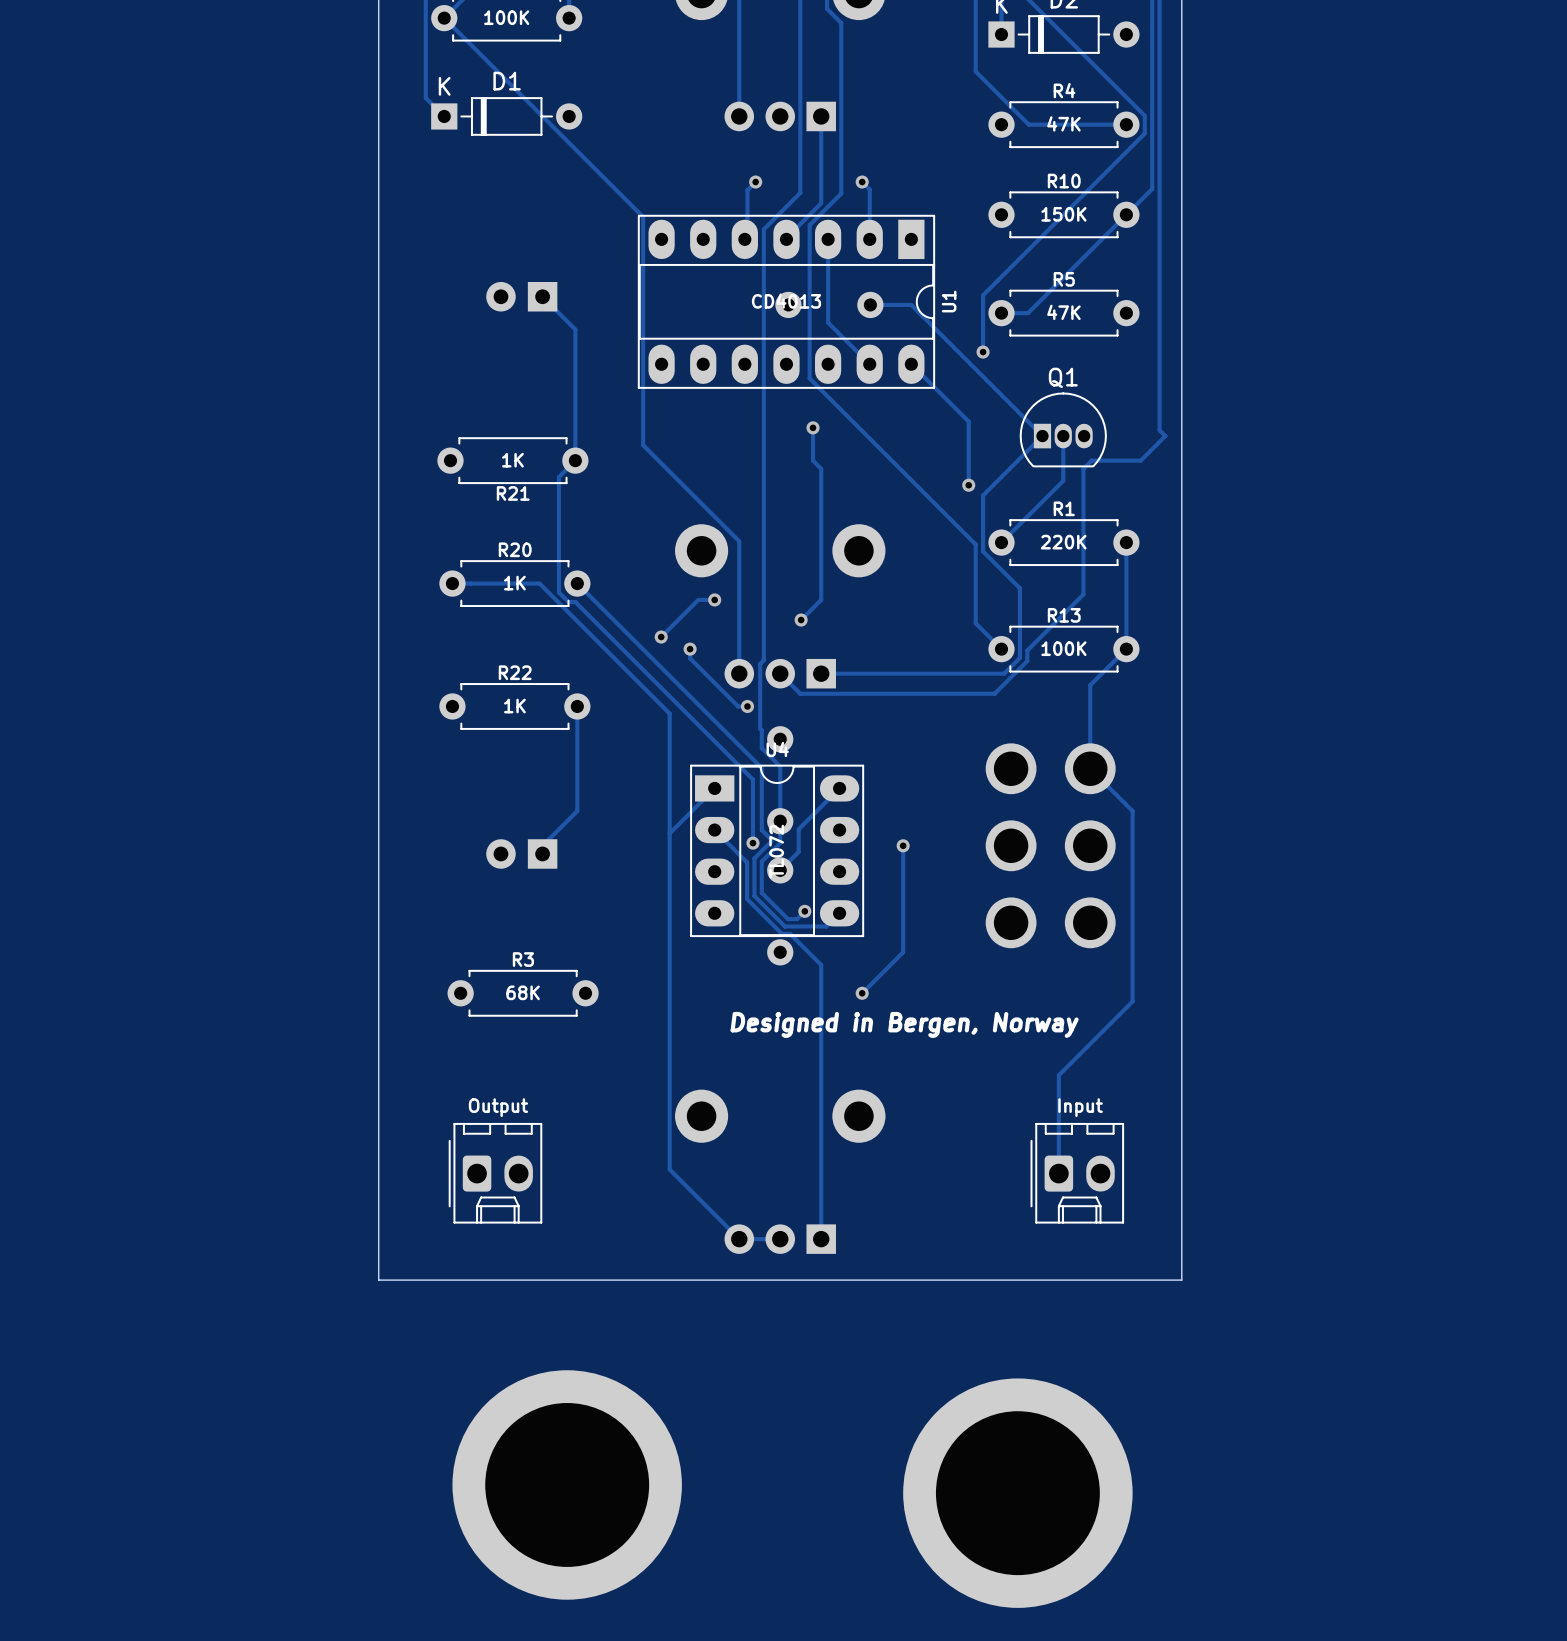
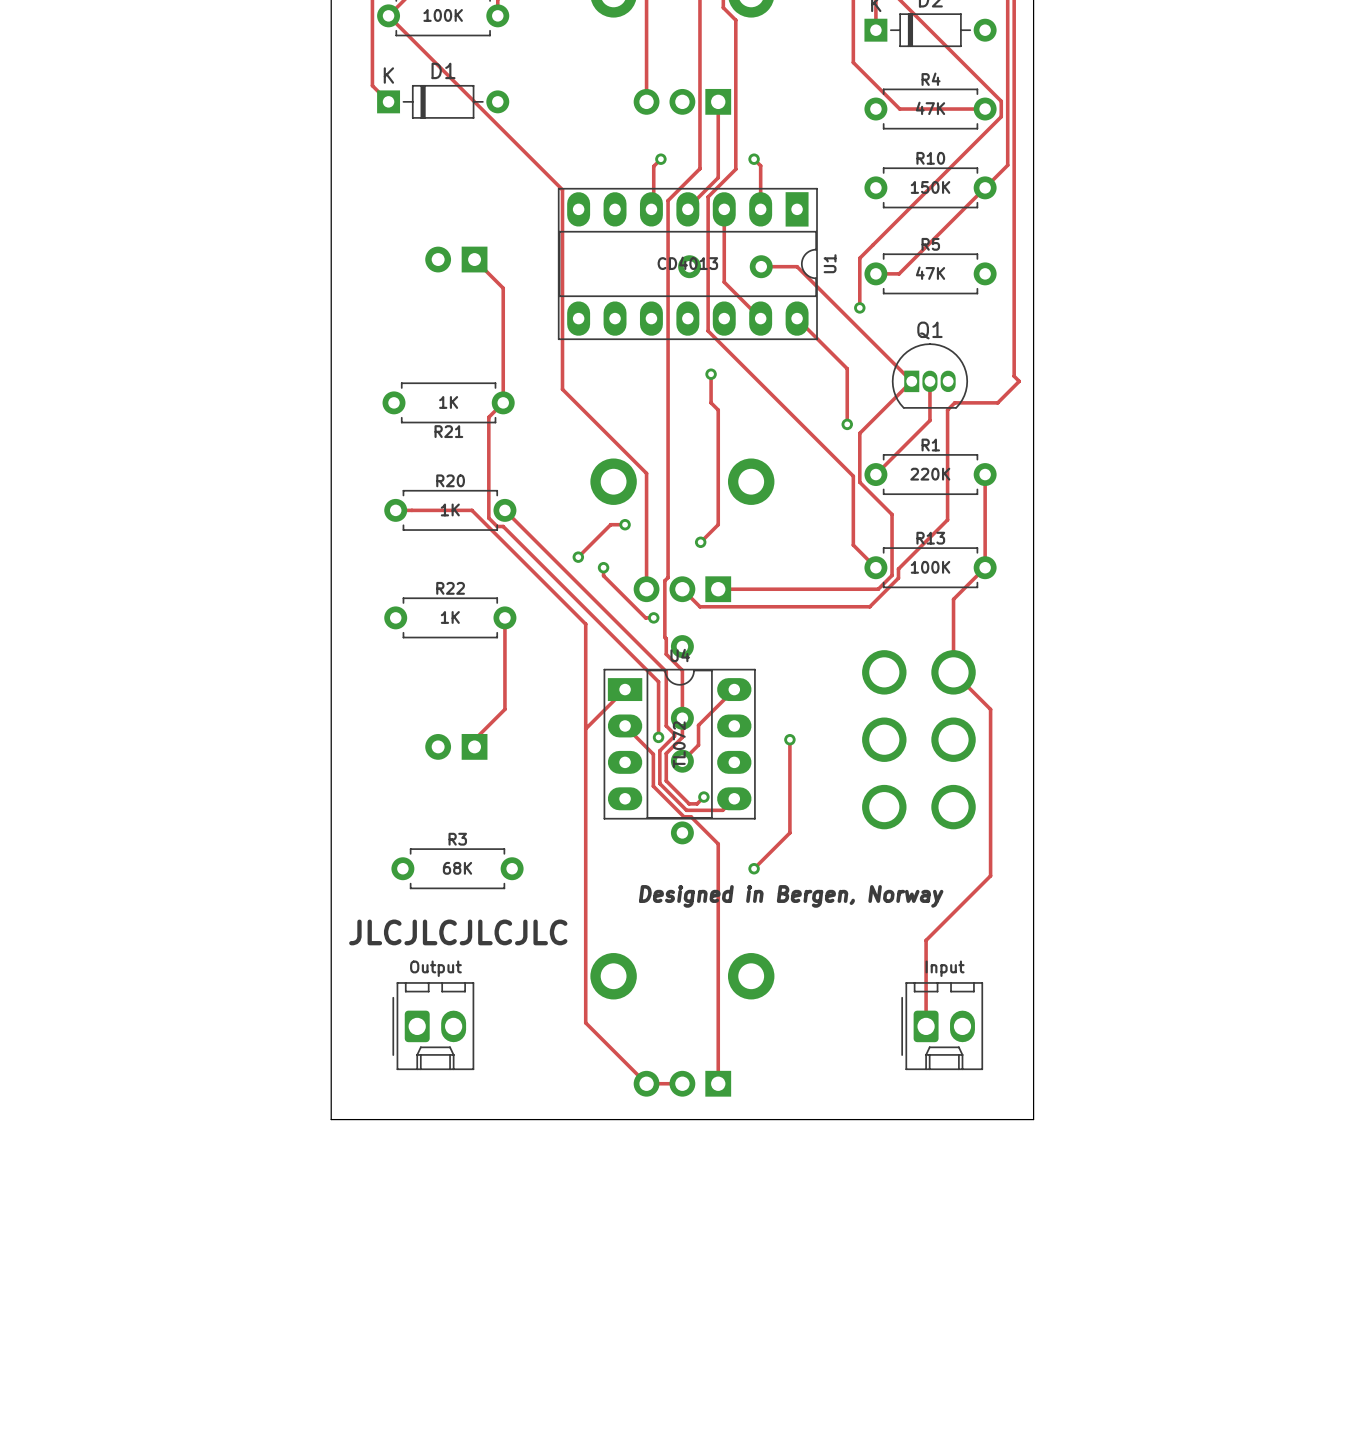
text: none -> JLCJLCJLCJLC (458, 932)
part: (567, 1484) -> none
part: (1017, 1493) -> none

